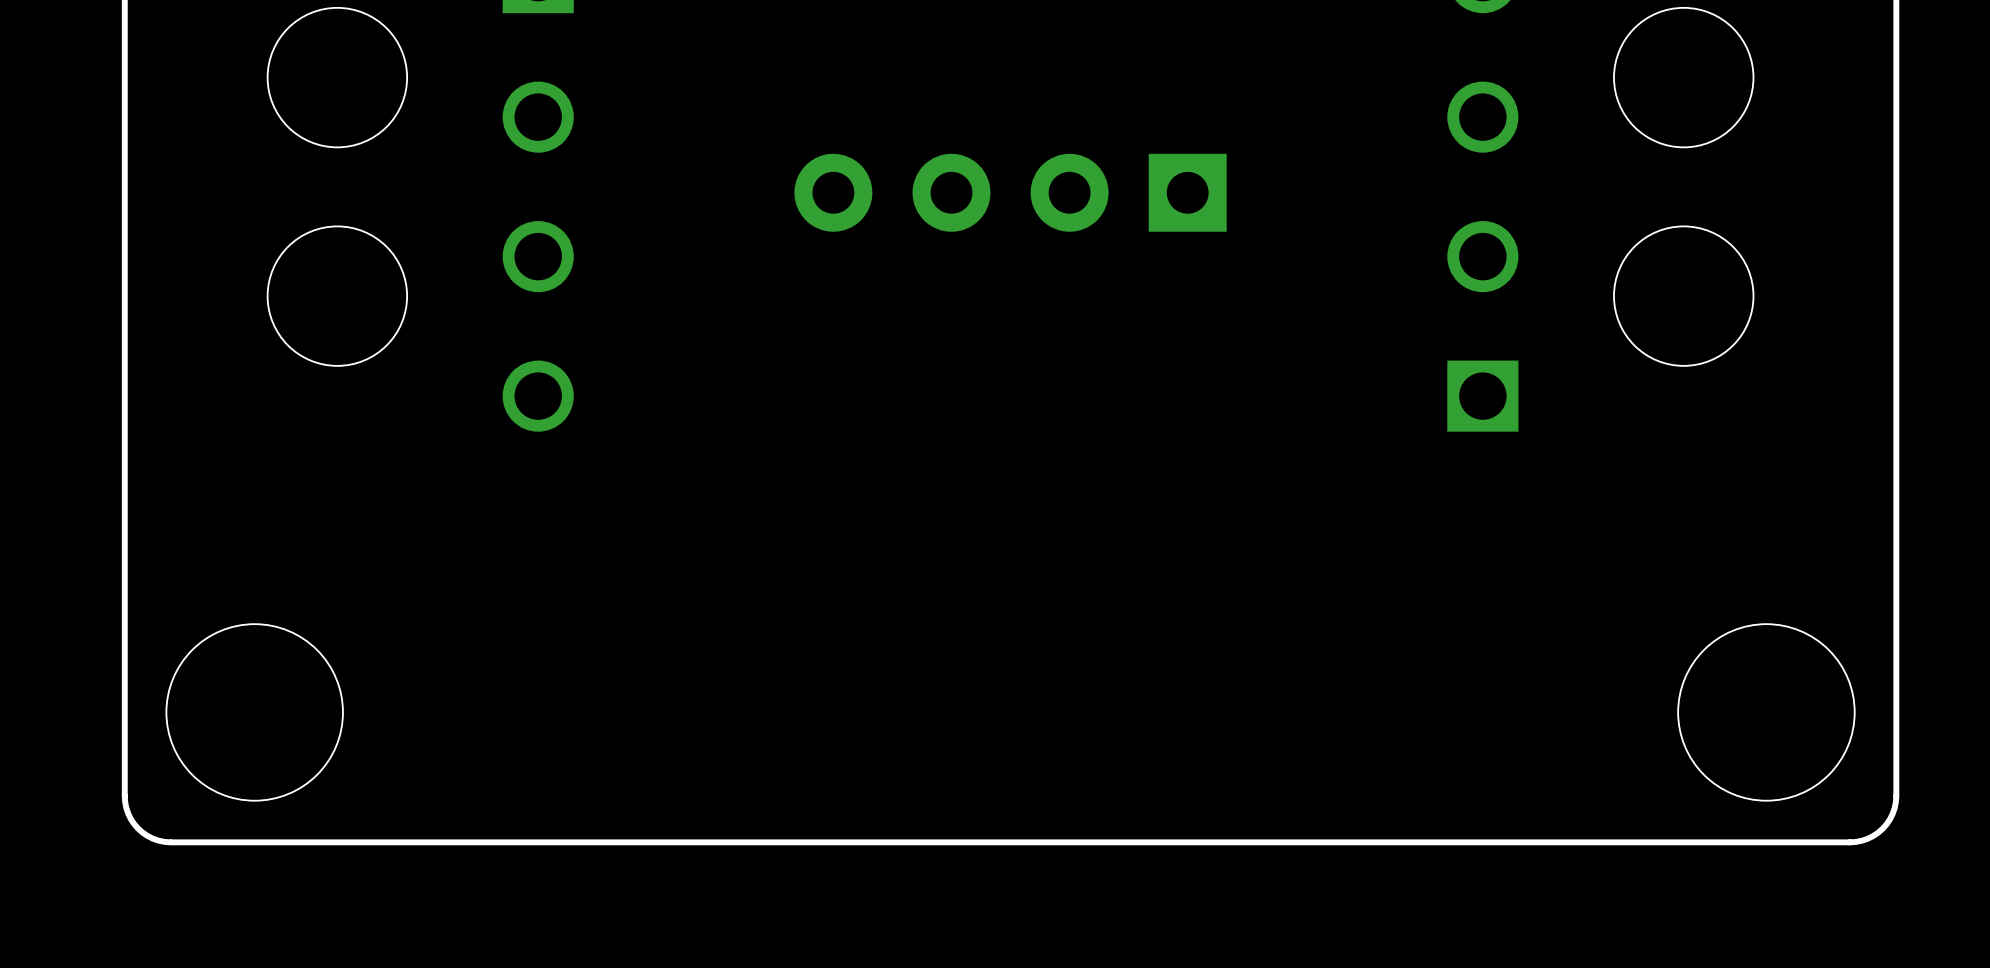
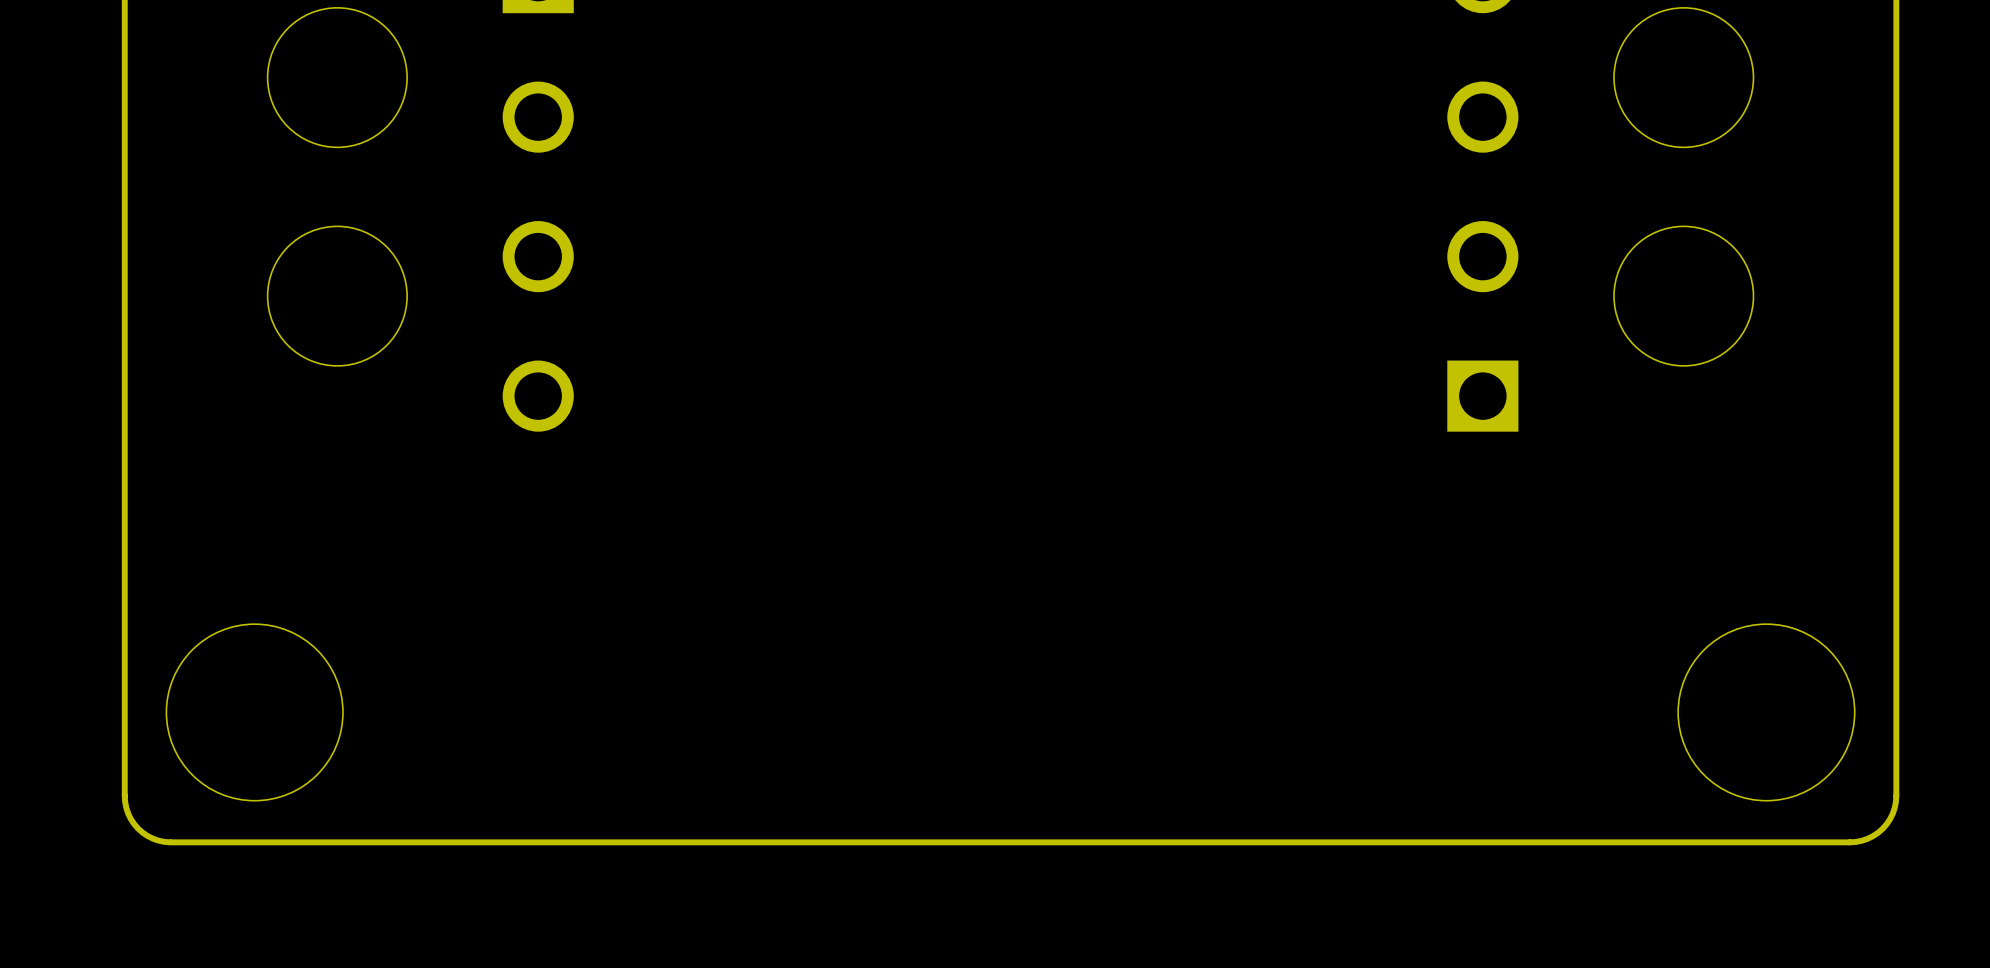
part: (1010, 192) -> none

